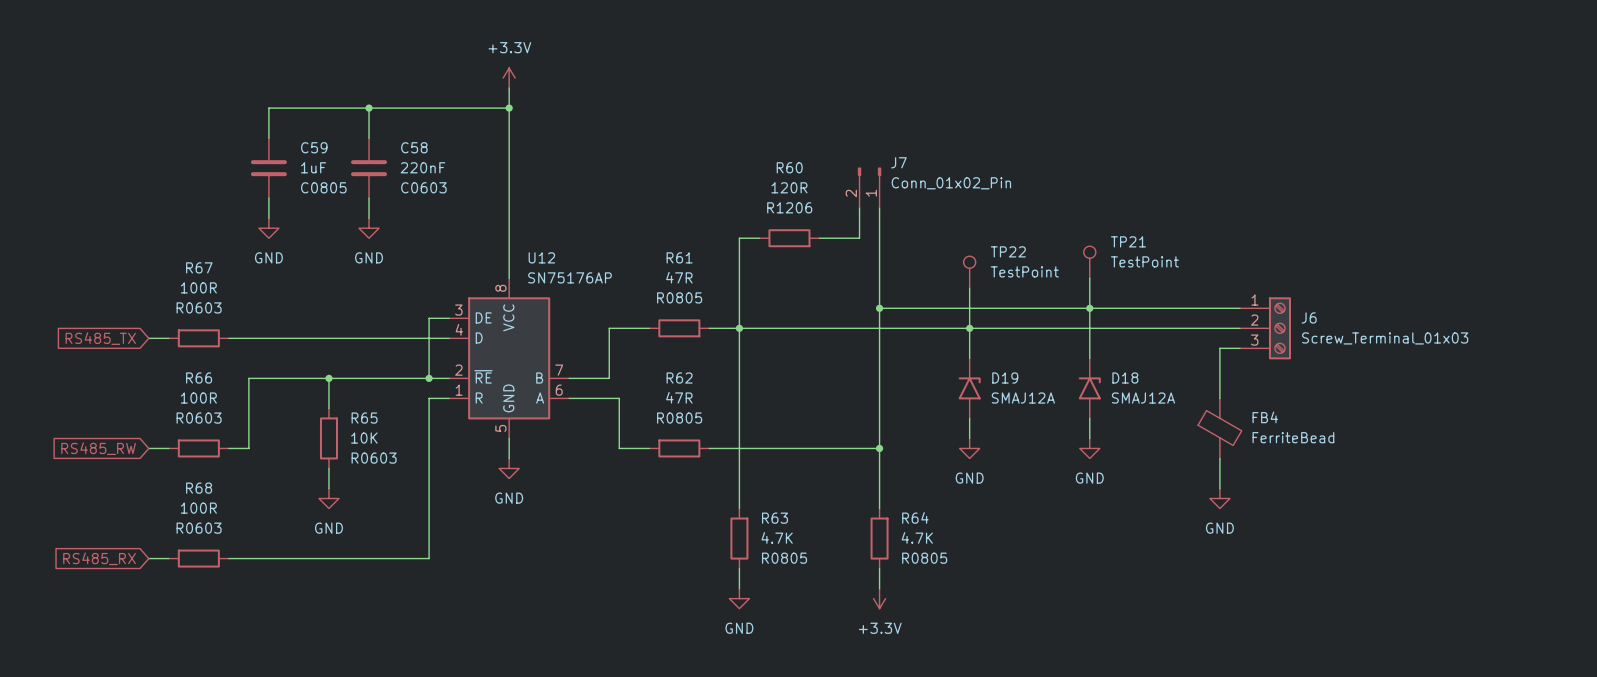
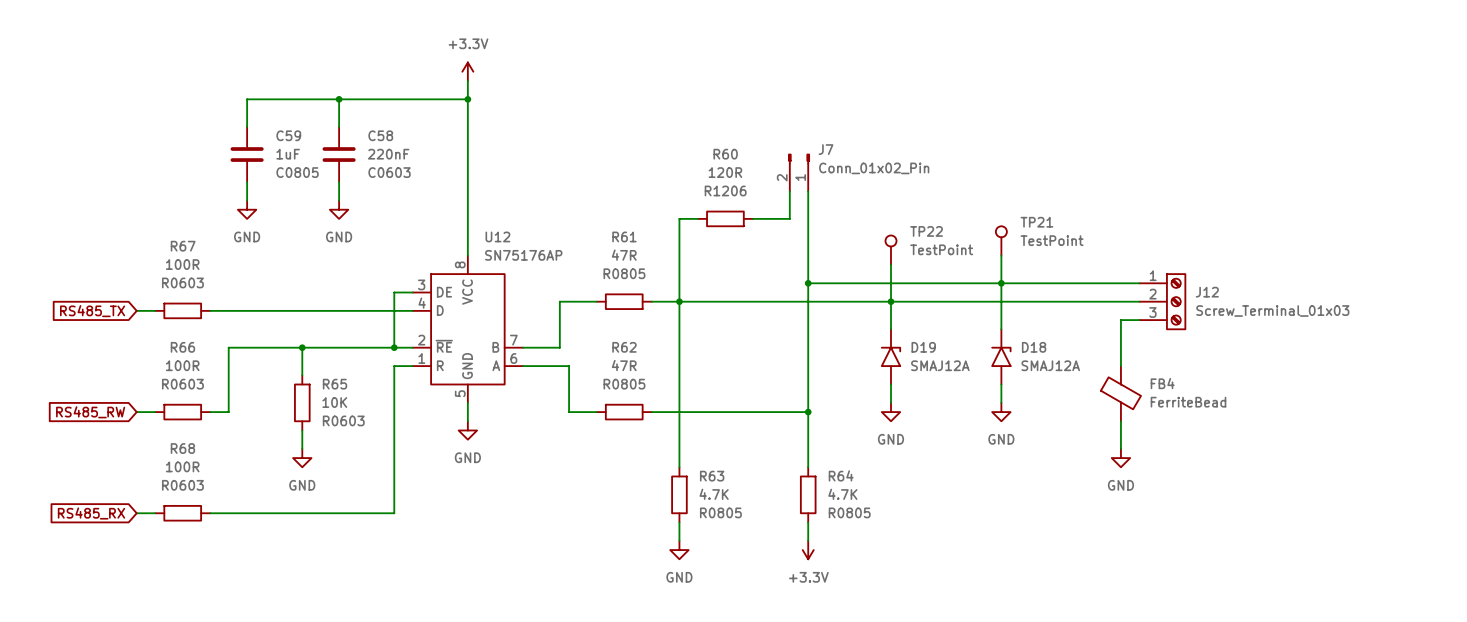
J6 name: J6 (1309, 317) -> J12 (1207, 292)

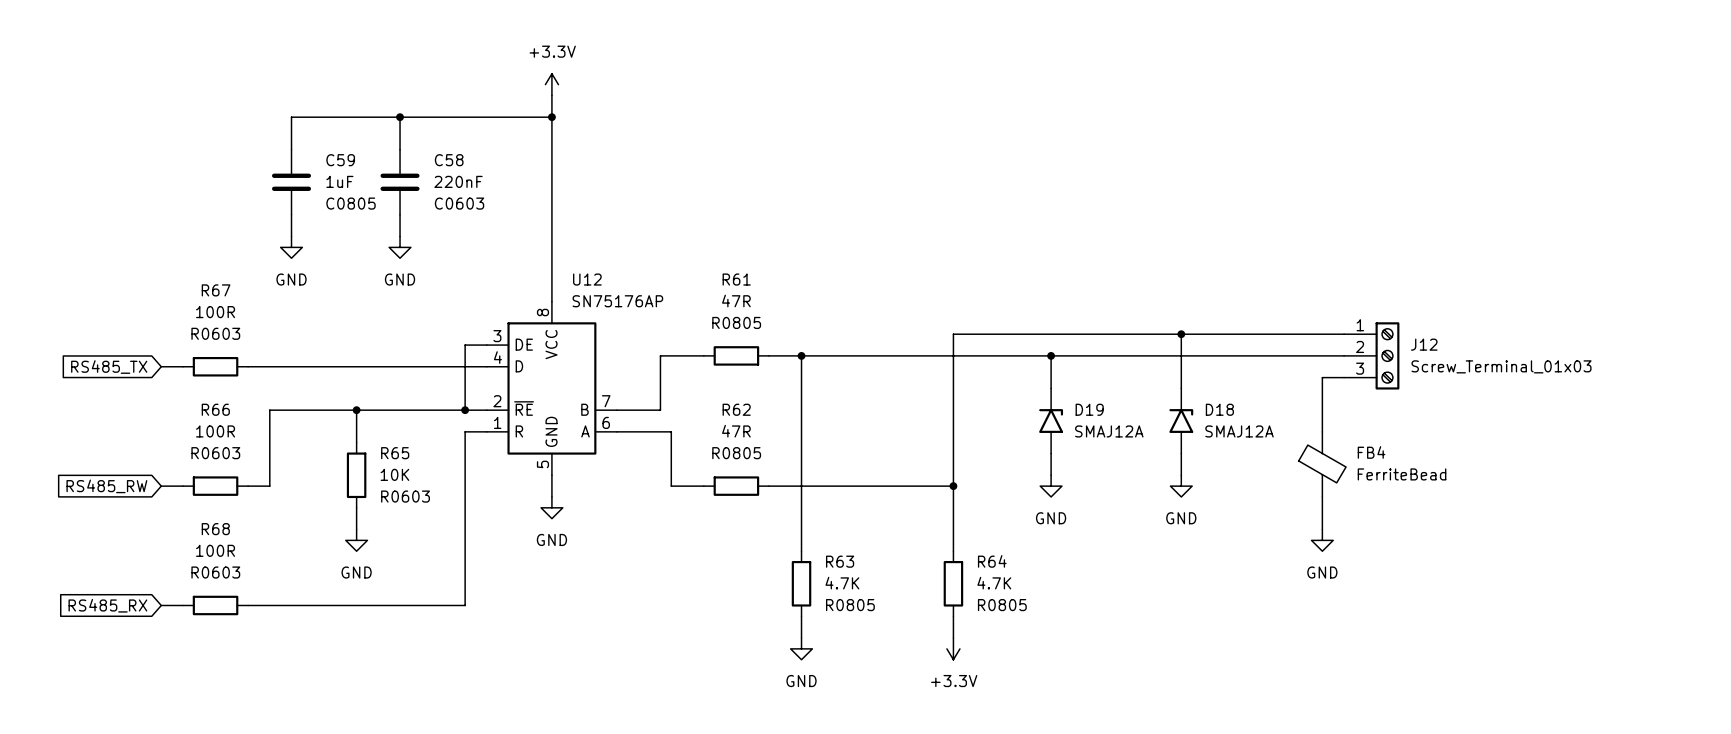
J7: Conn_01x02_Pin (799, 172) -> none
wire: (789, 191) (789, 218) (753, 218) -> none
wire: (808, 191) (808, 283) -> none
wire: (697, 218) (679, 218) (679, 301) -> none
R60: 120R (725, 218) -> none
TP21: TestPoint (1001, 240) -> none
TP22: TestPoint (891, 250) -> none
wire: (1001, 255) (1001, 283) -> none
wire: (891, 264) (891, 301) -> none
junction: (808, 283) -> none

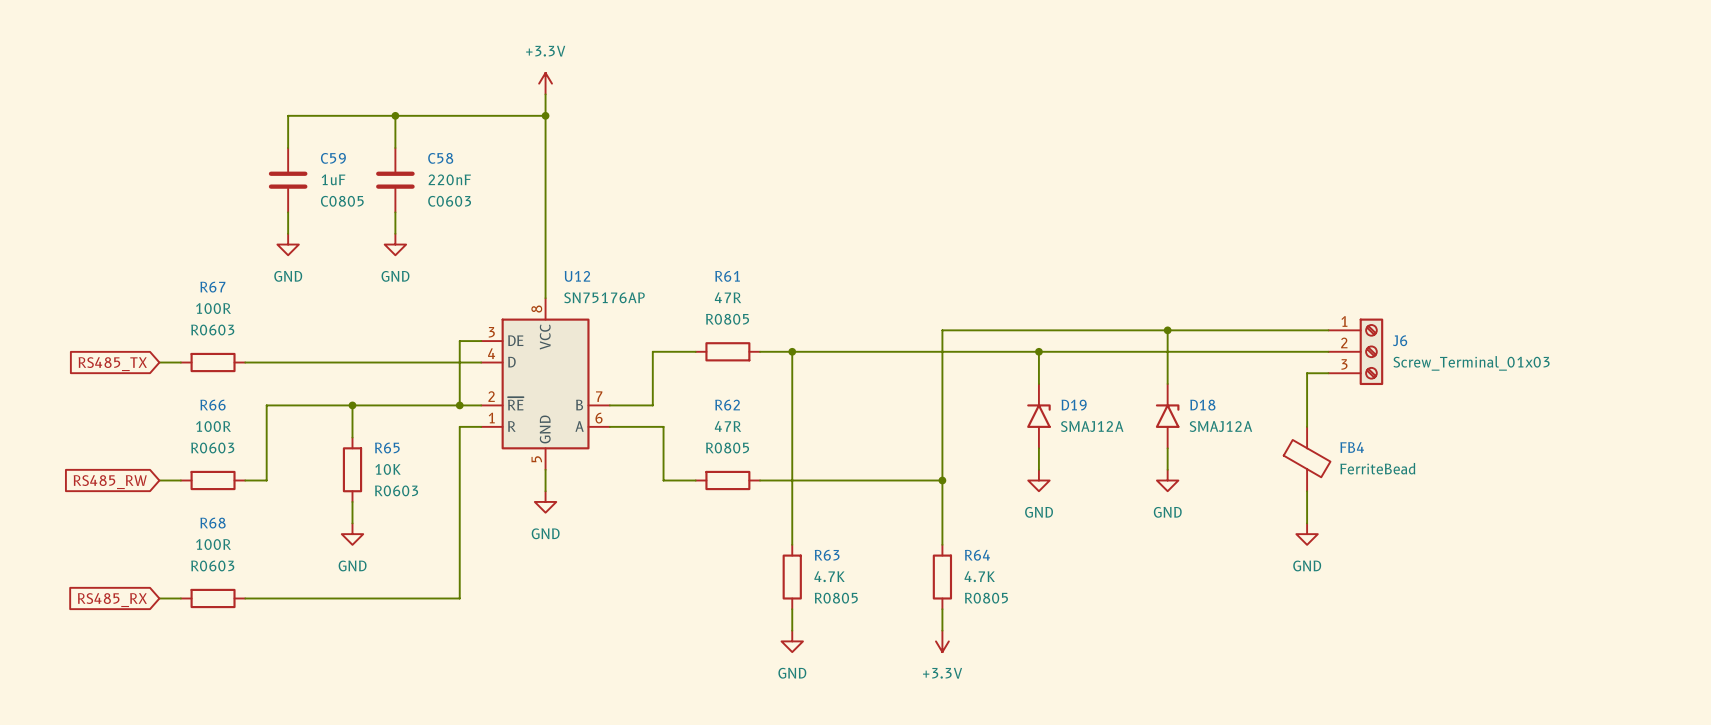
J12 name: J12 (1424, 344) -> J6 (1400, 340)

